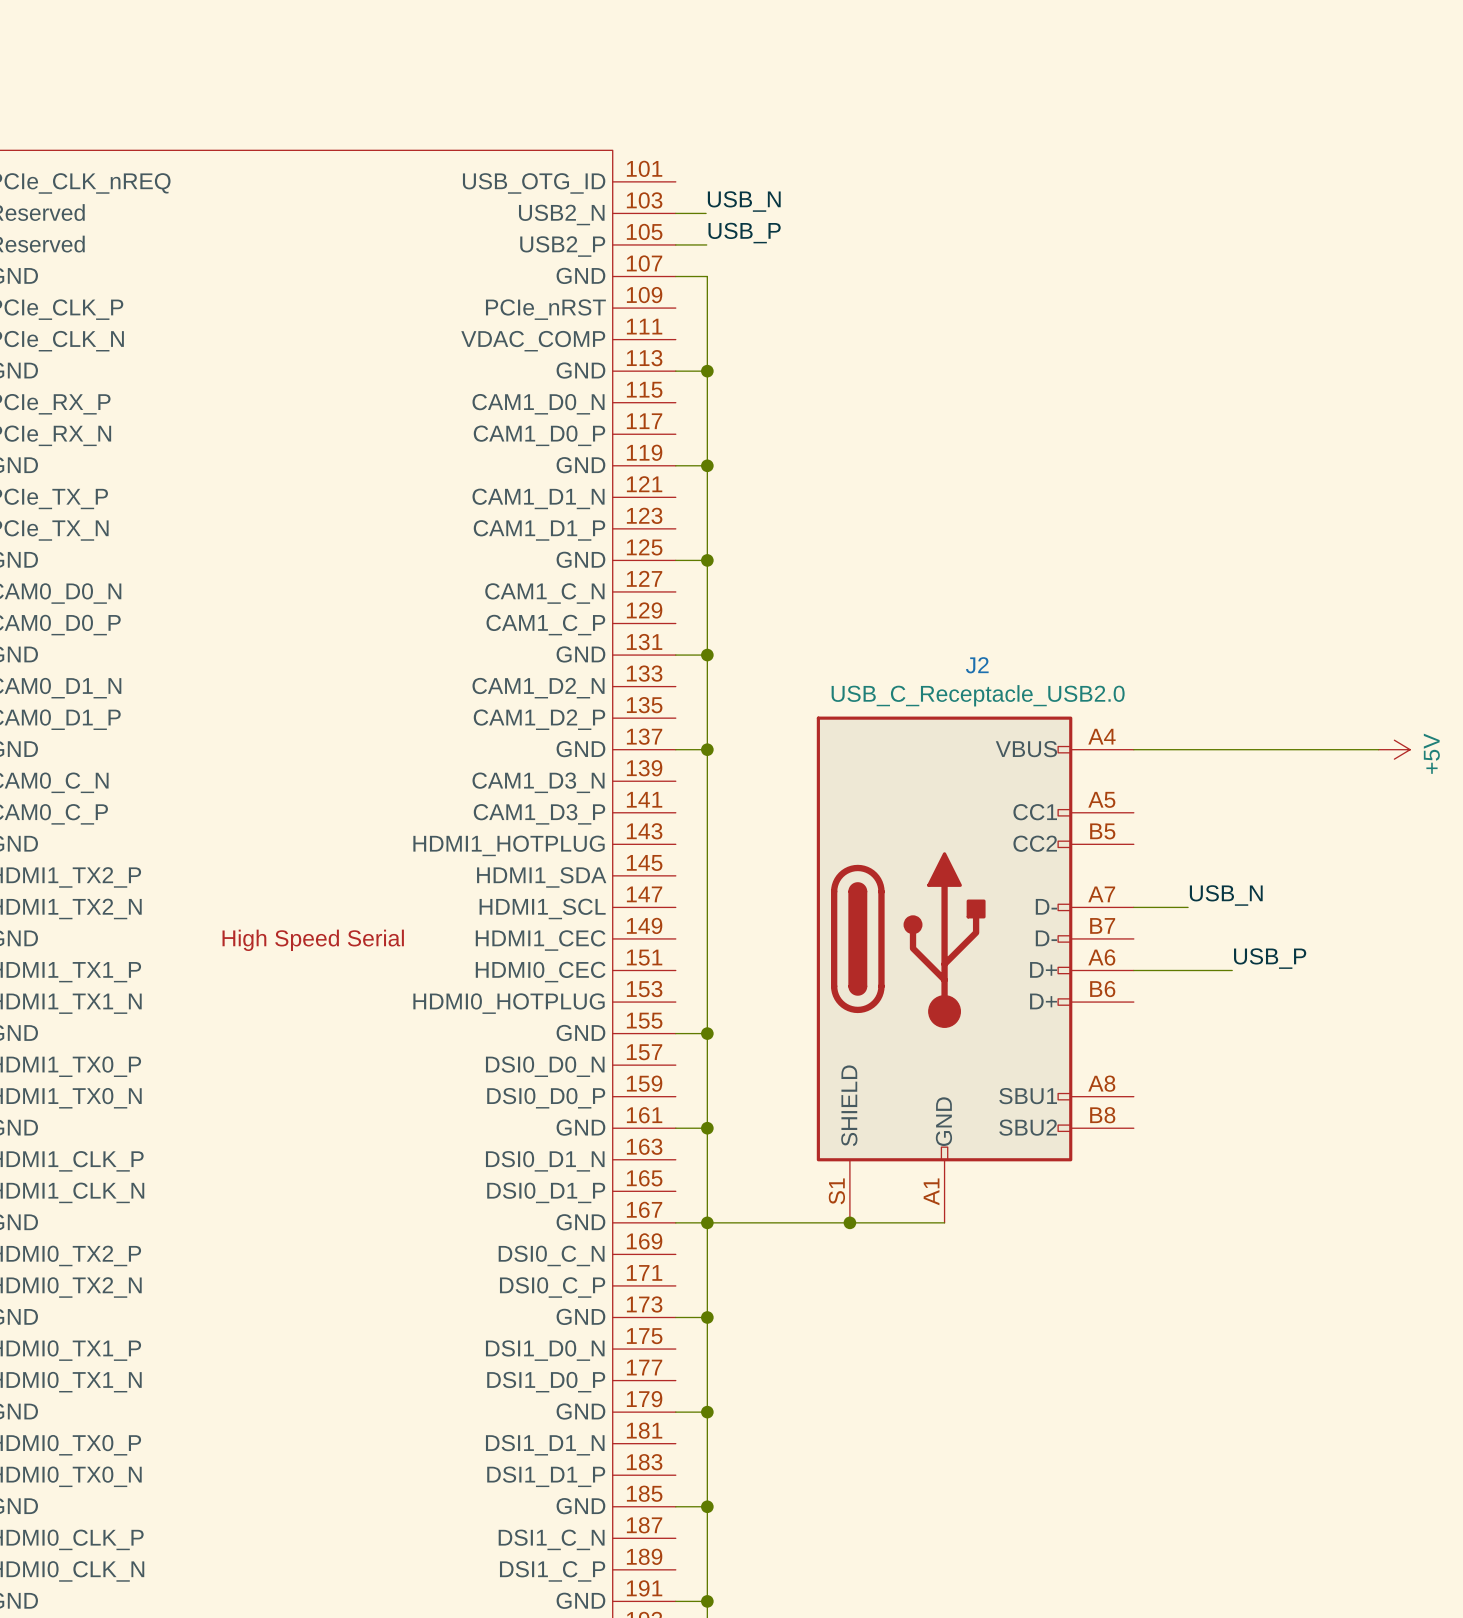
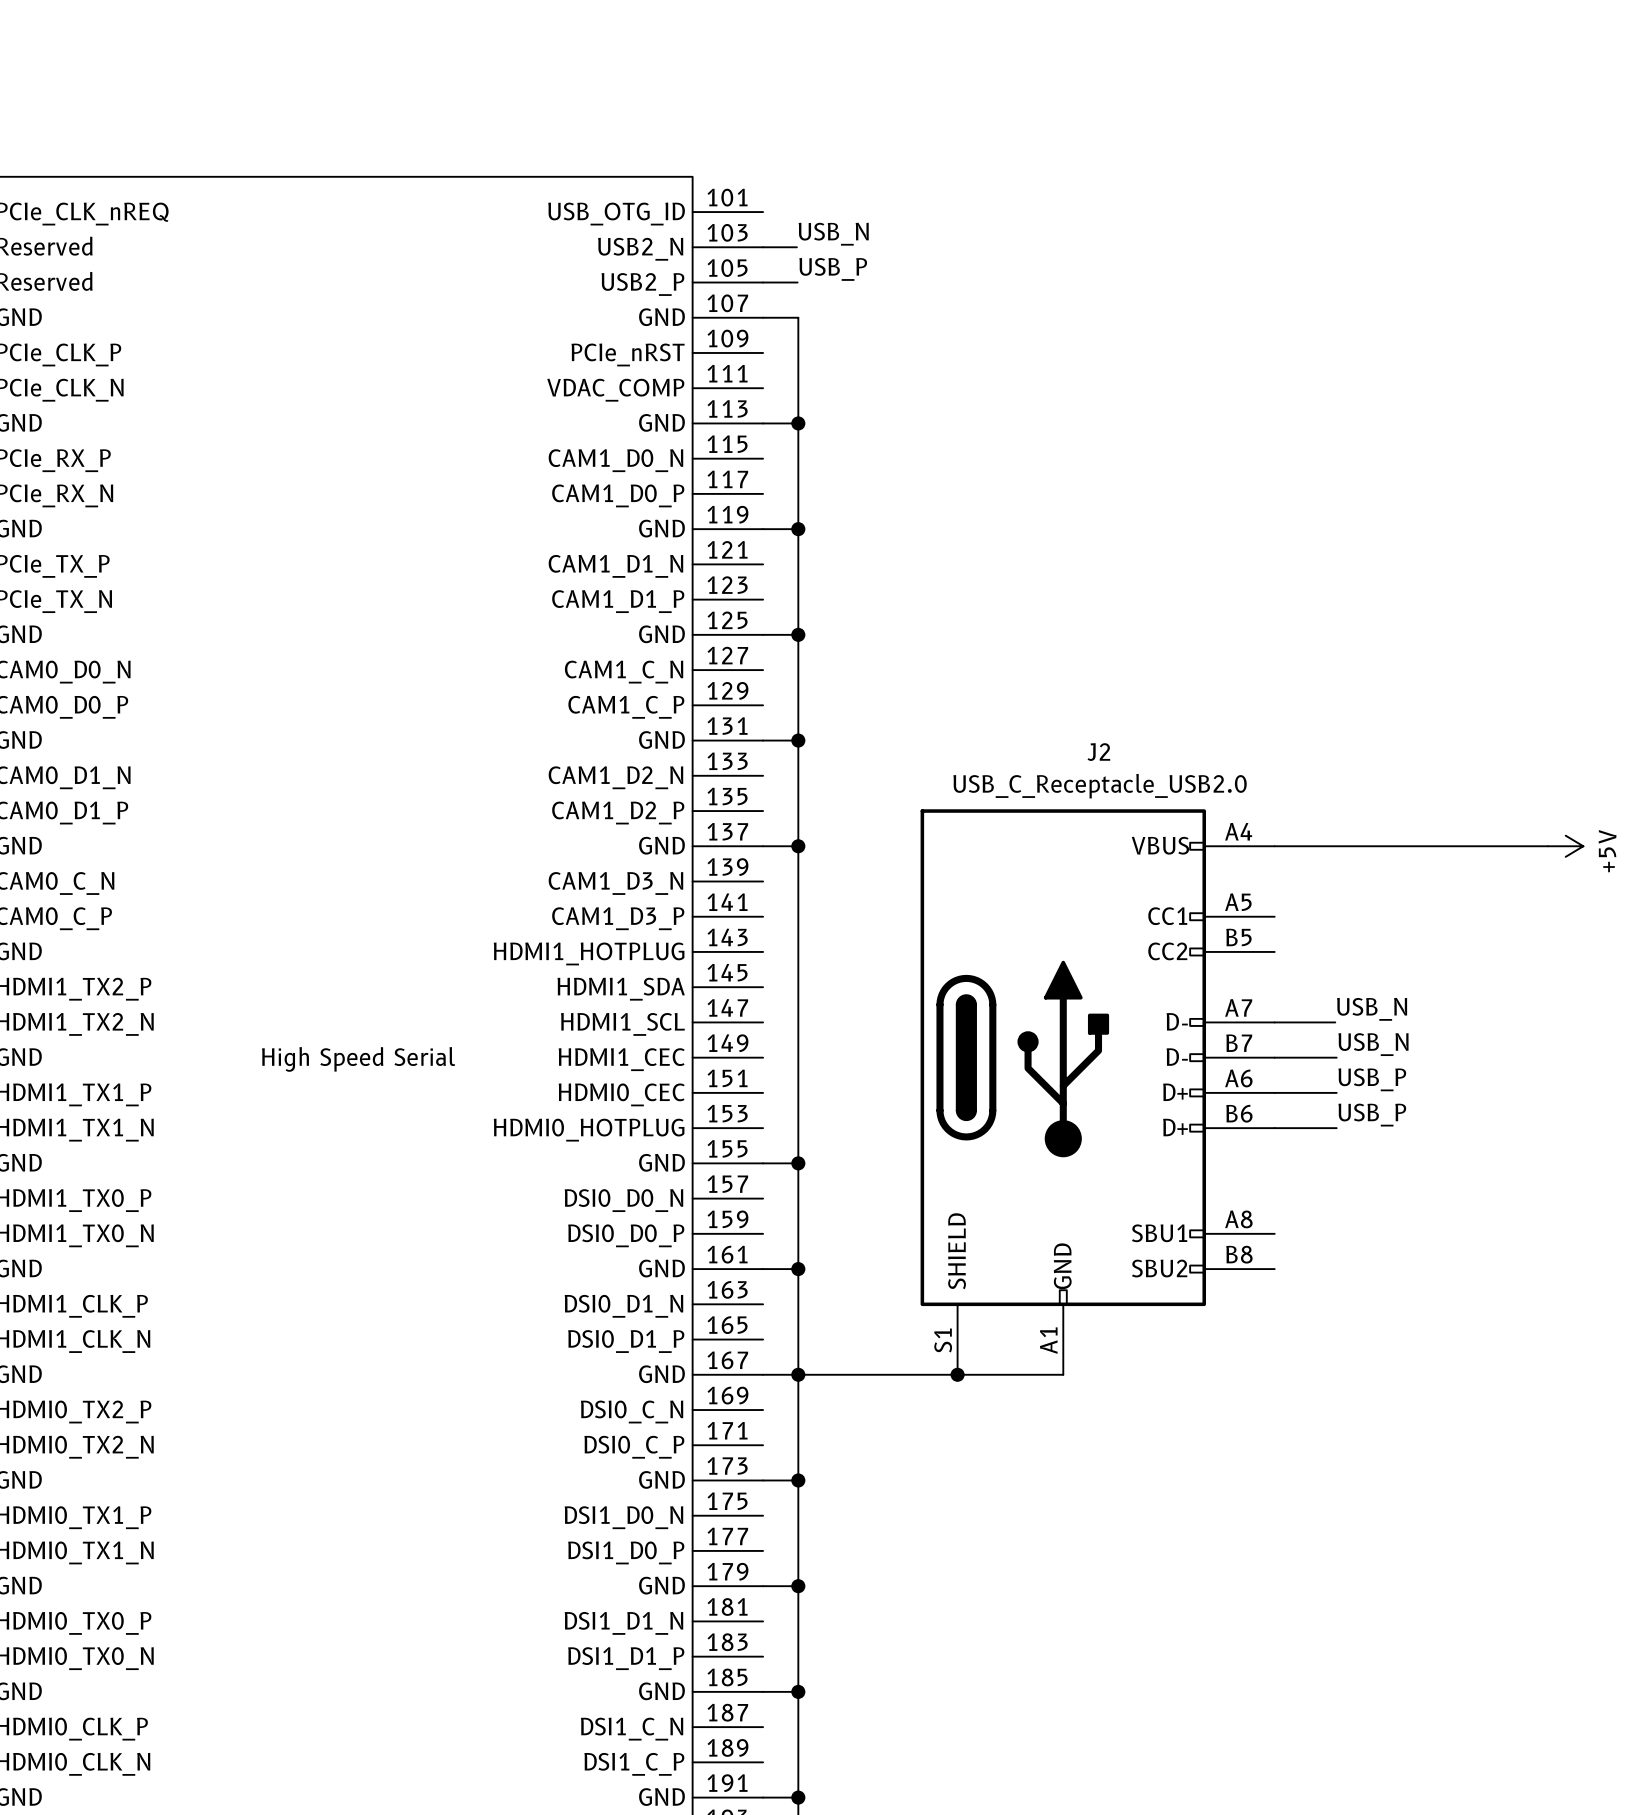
label: none -> USB_N (1373, 1044)
wire: none -> (1274, 1057) (1336, 1057)
label: none -> USB_P (1372, 1079)
label: USB_P (1270, 958) -> none
wire: (1189, 970) (1232, 970) -> none
label: none -> USB_P (1372, 1115)
wire: none -> (1274, 1128) (1336, 1128)

